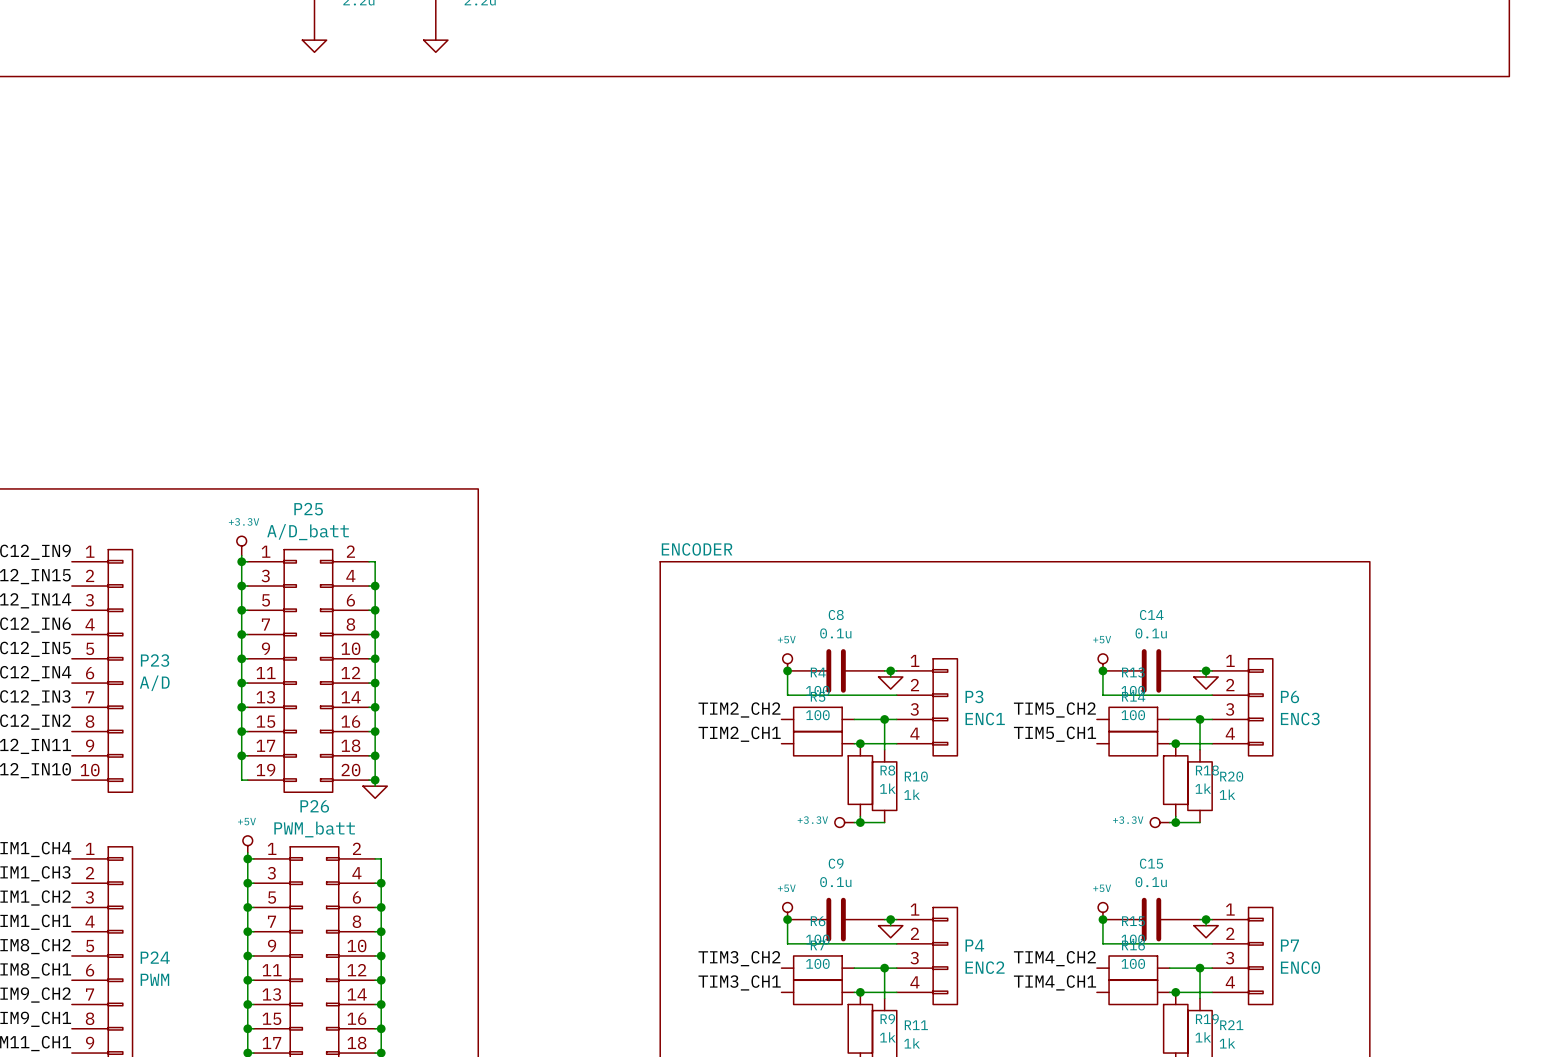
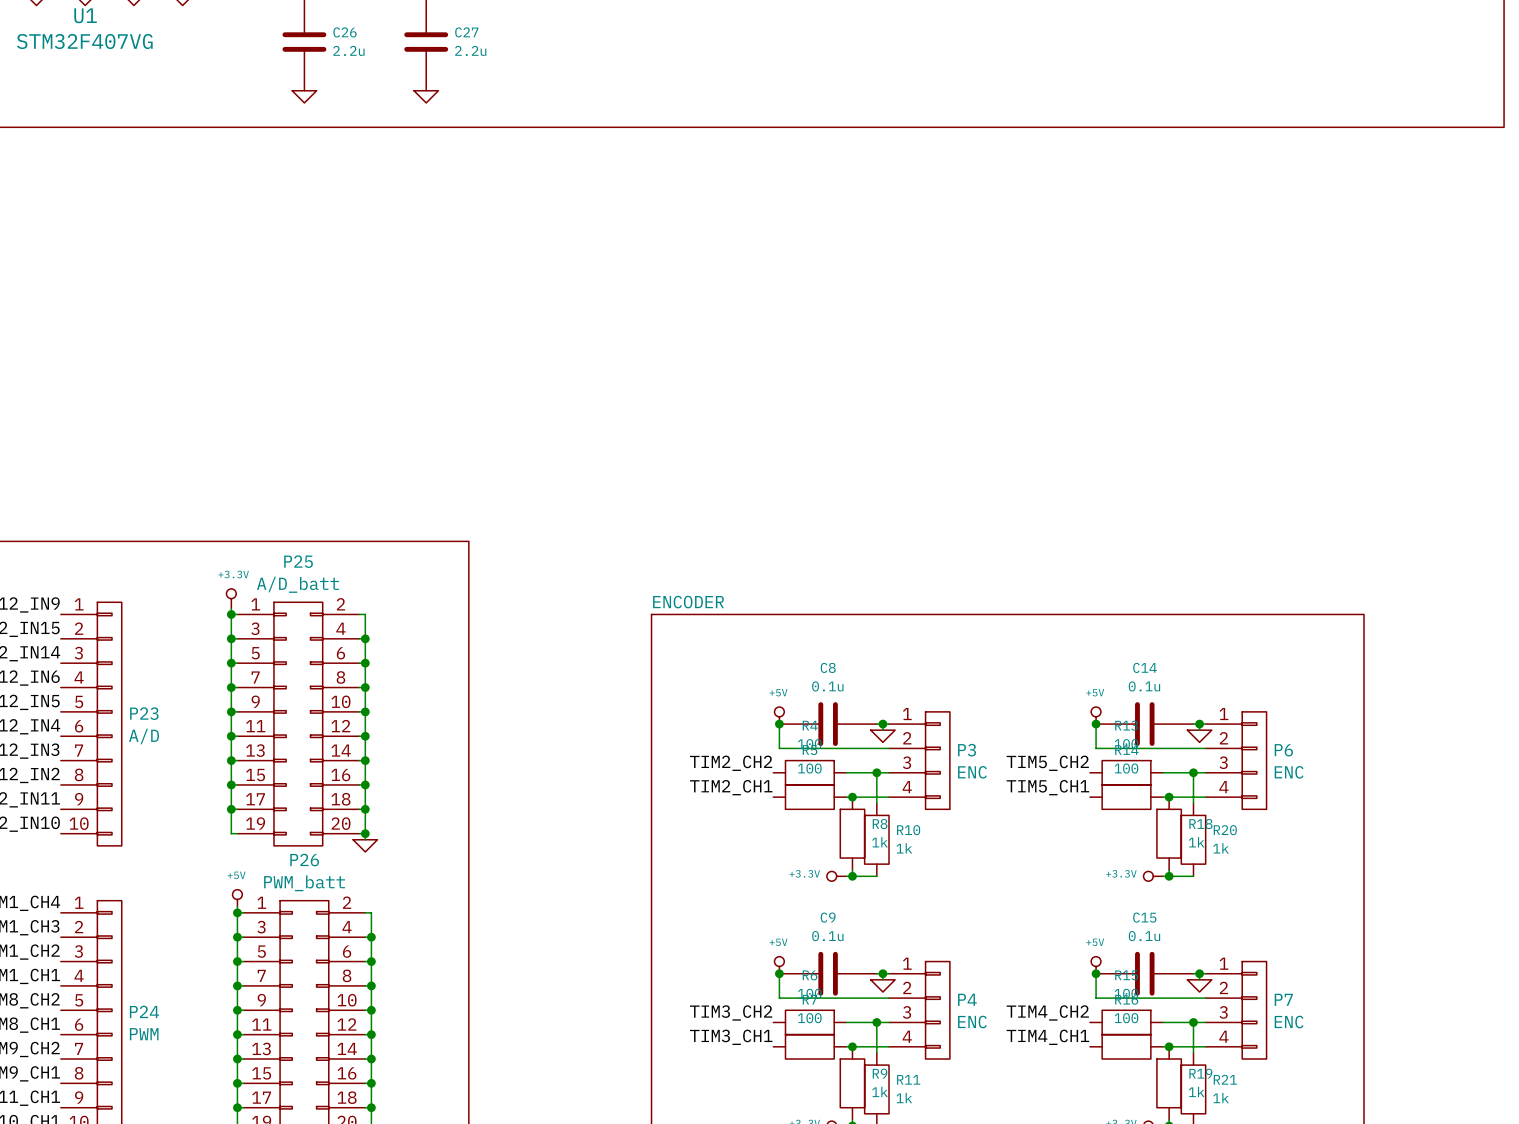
P3 value: ENC1 (985, 718) -> ENC (972, 772)
P6 value: ENC3 (1300, 718) -> ENC (1289, 772)
P4 value: ENC2 (985, 967) -> ENC (972, 1022)
P7 value: ENC0 (1300, 967) -> ENC (1289, 1022)

